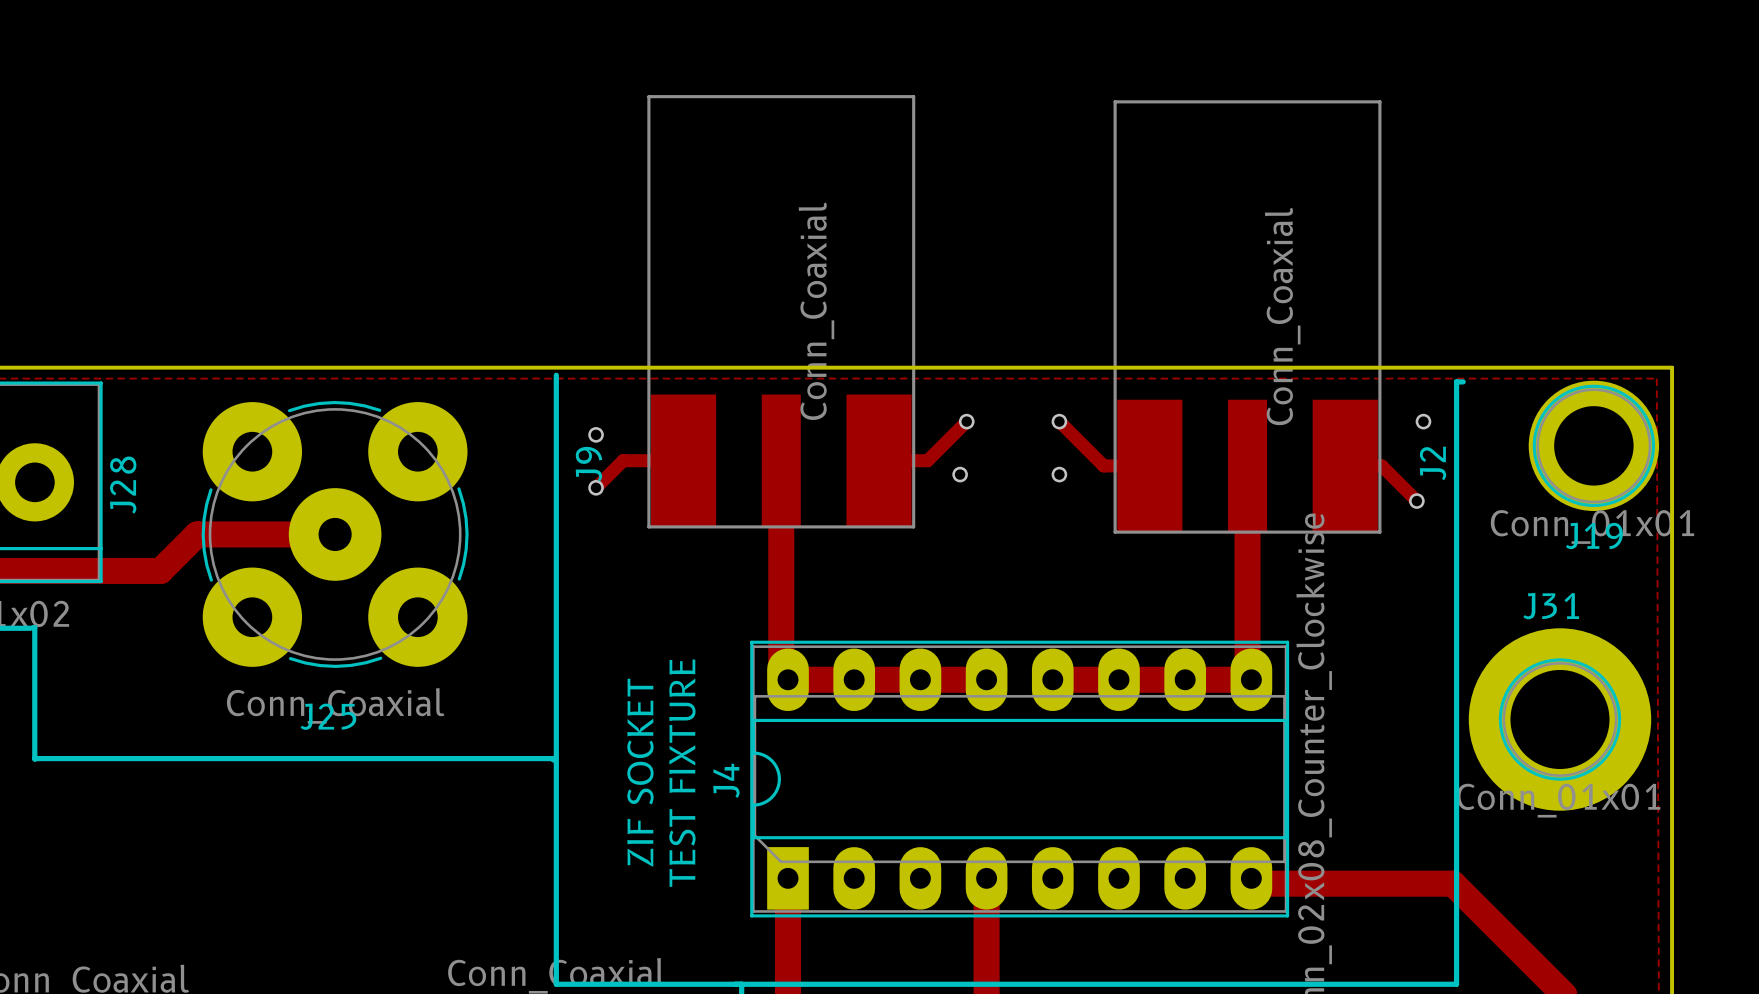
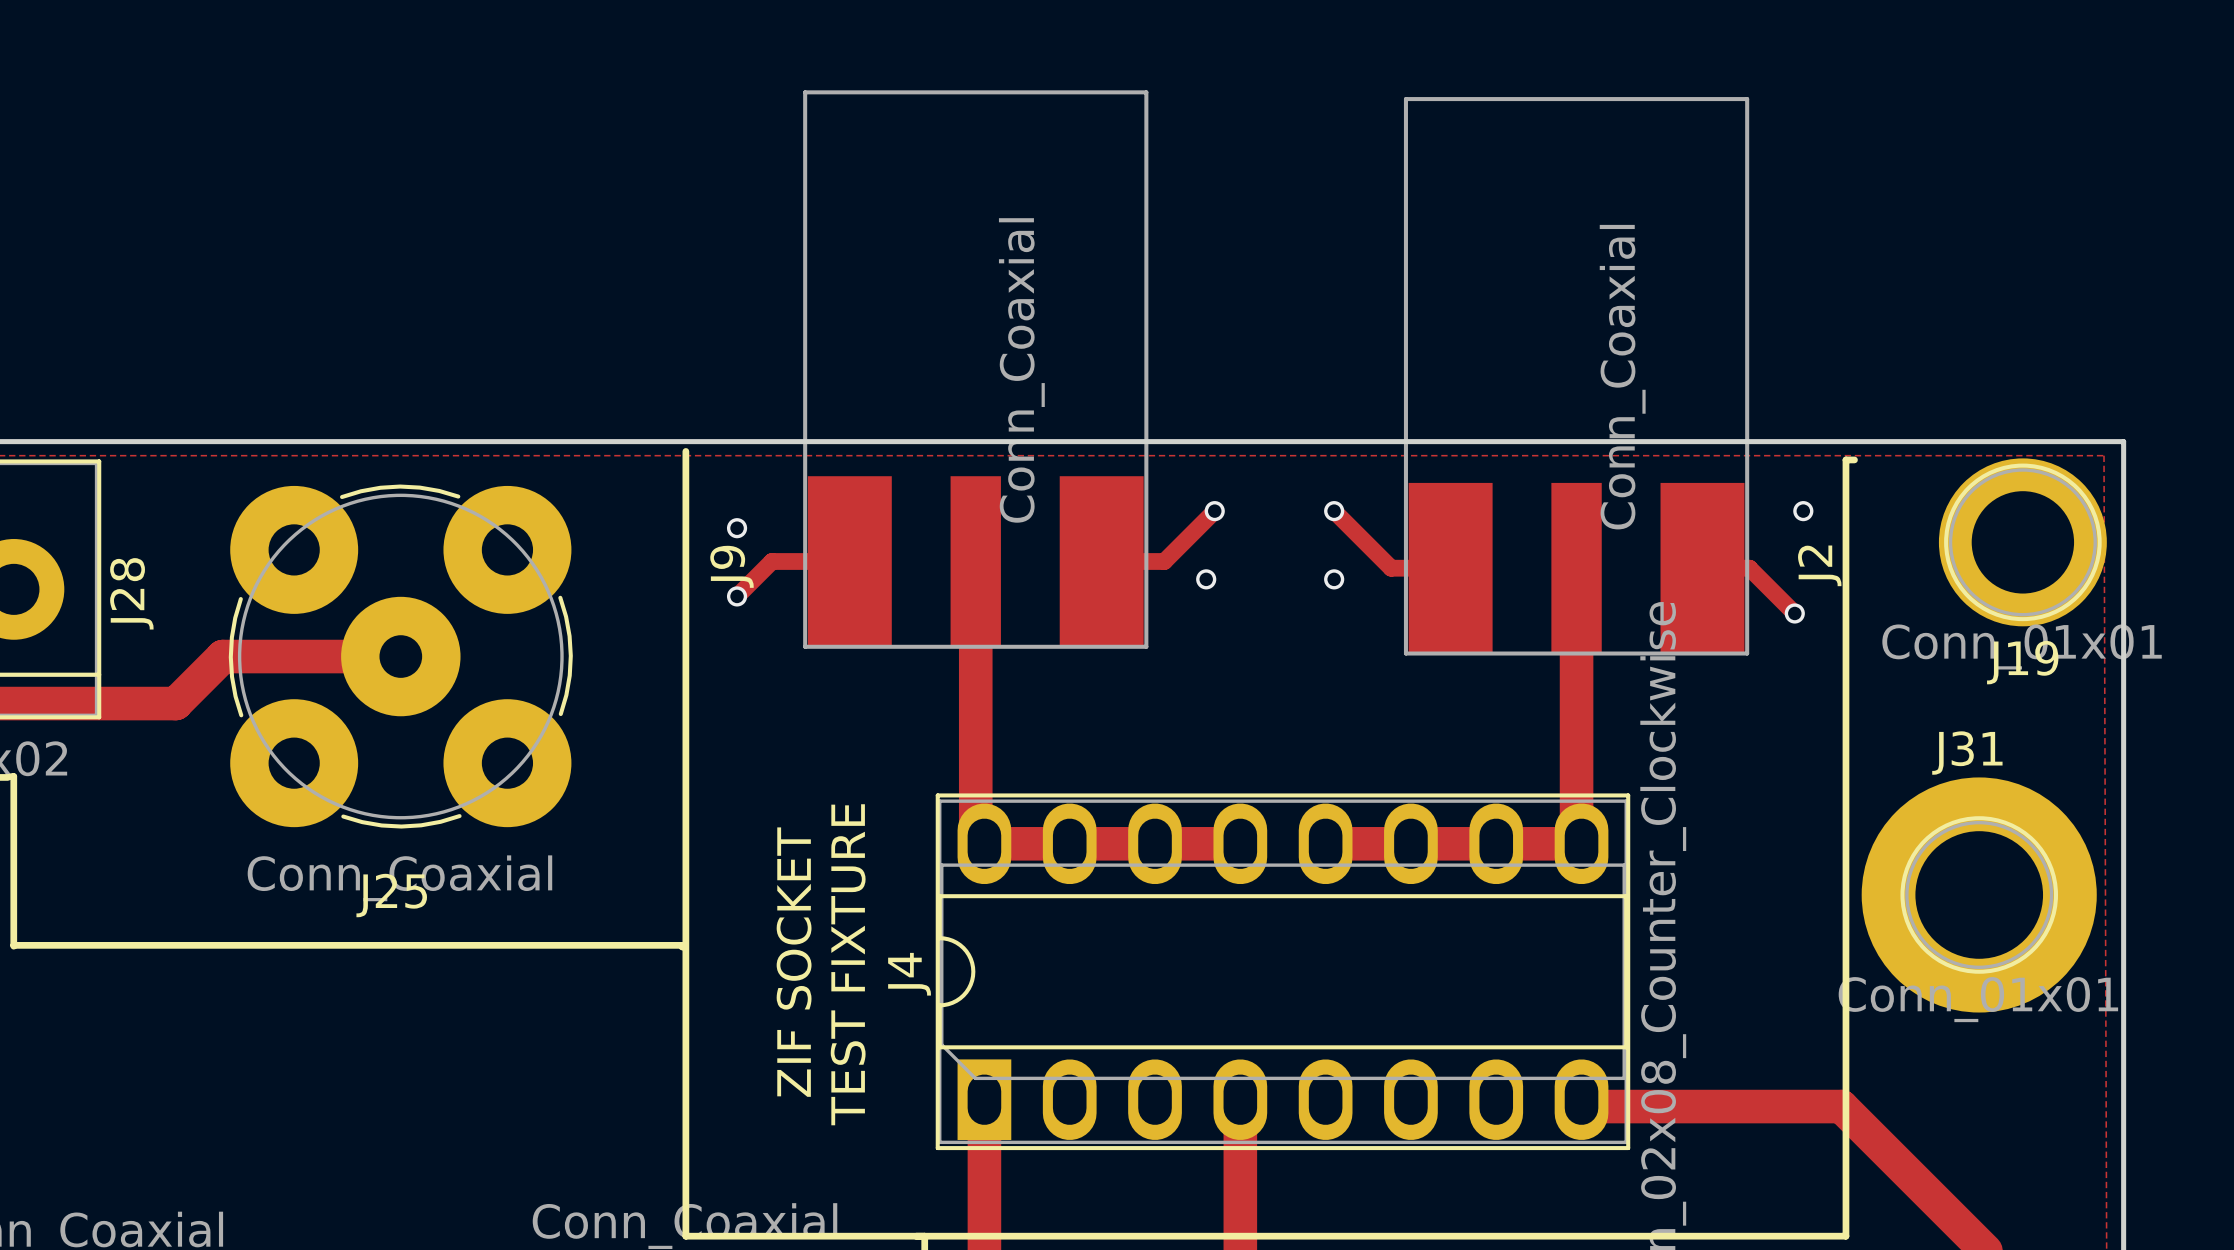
J4 footprint: [750, 640, 1290, 918] -> [935, 793, 1631, 1151]

